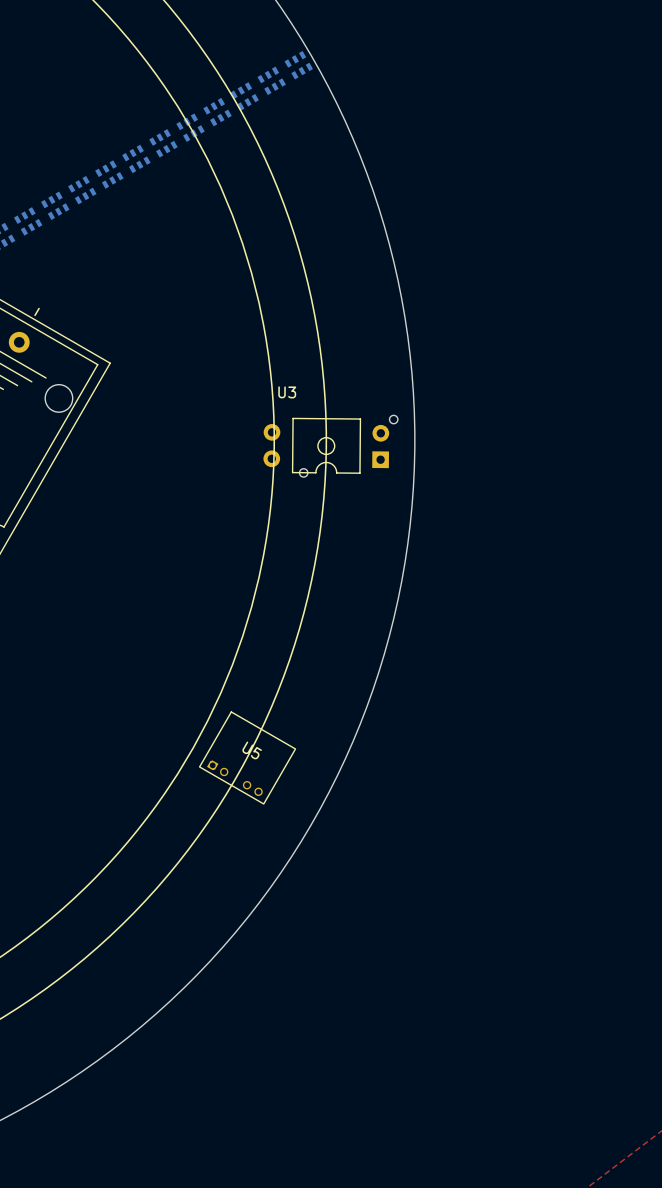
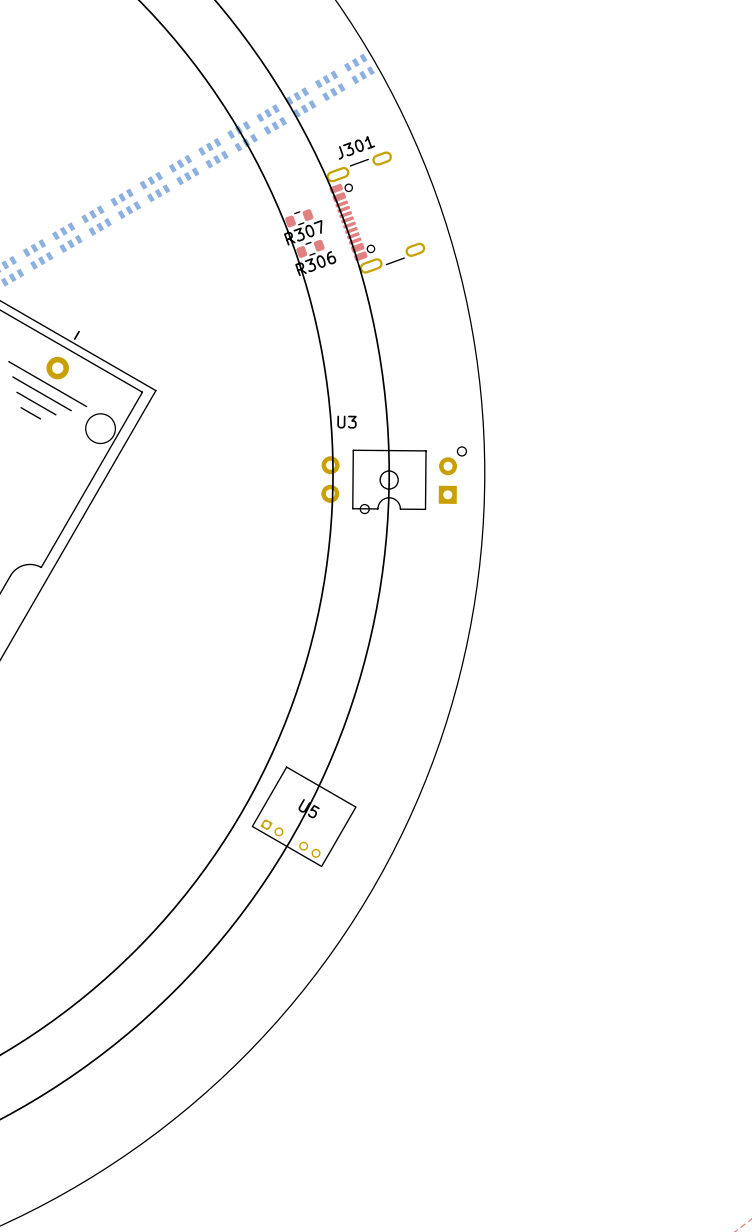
J301: none -> (375, 212)
R307: none -> (299, 218)
R306: none -> (310, 248)

